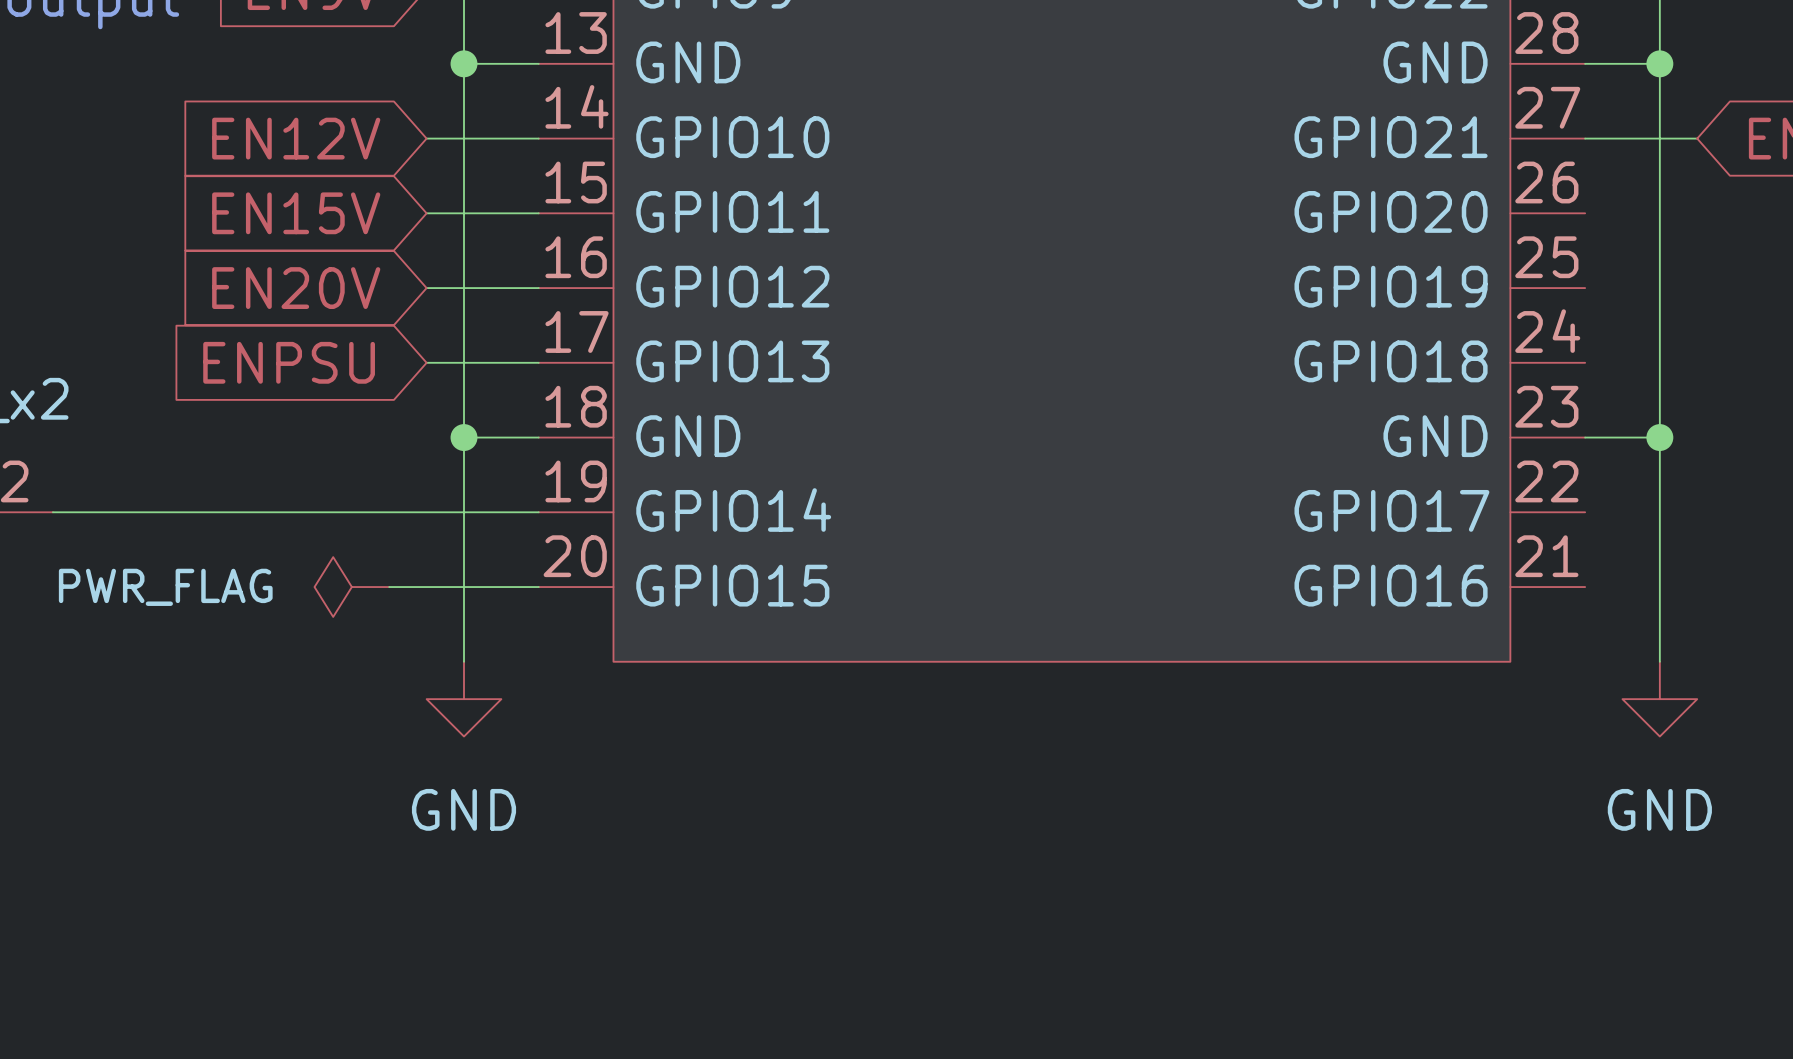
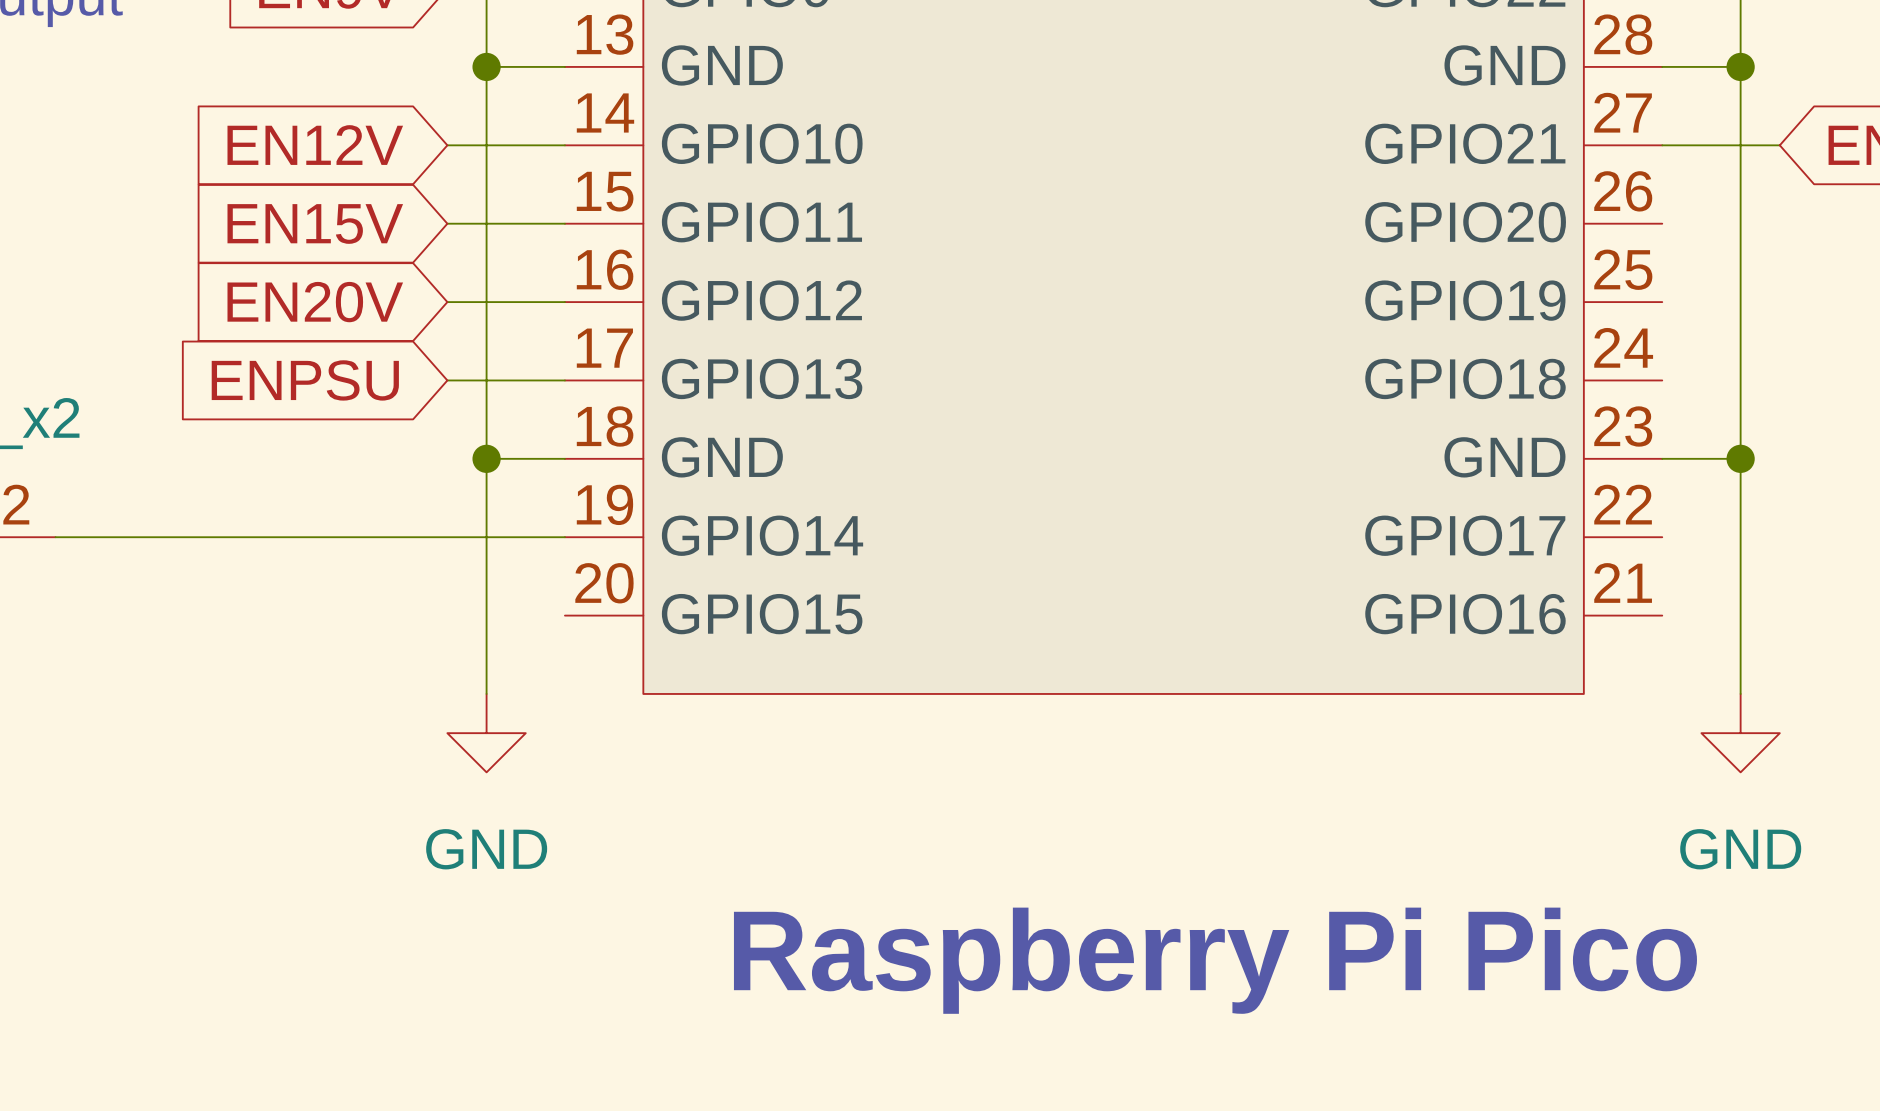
power symbol: PWR_FLAG (351, 587) -> none
wire: (389, 587) (538, 587) -> none
text: none -> Raspberry Pi Pico (1215, 960)

